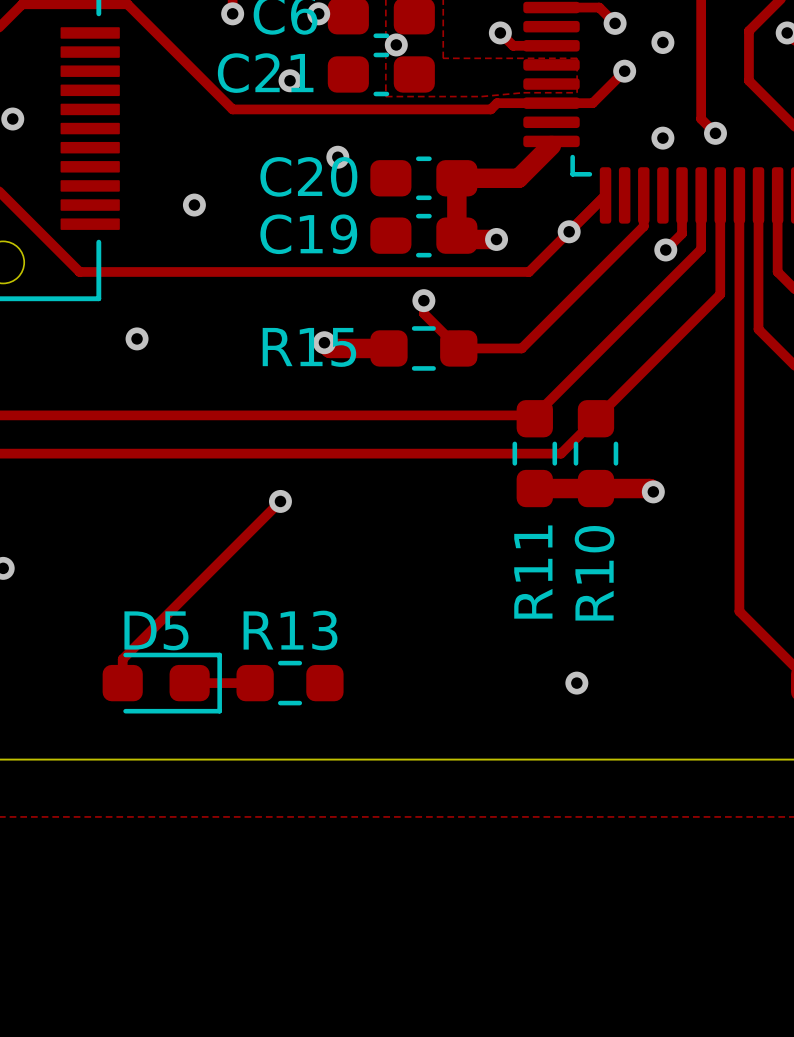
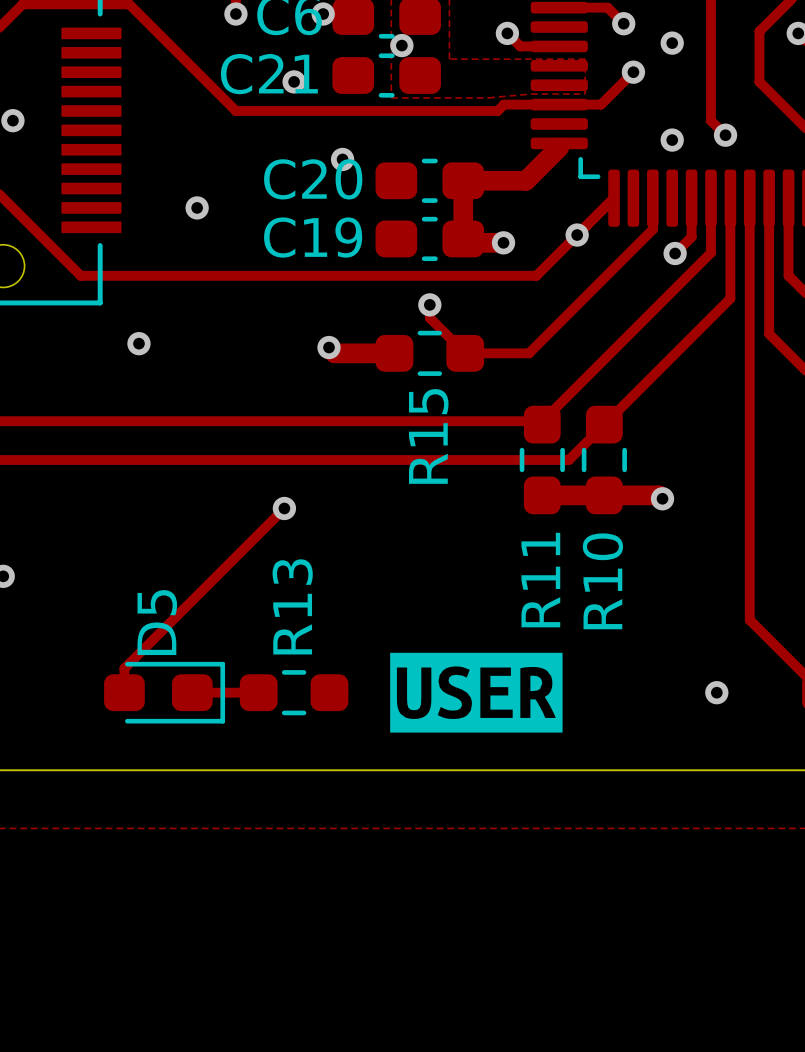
R15 name rotation: 0° (309, 347) -> 90° counterclockwise (428, 436)
R15 name position: R15 (309, 347) -> R15 (428, 436)
D5 name rotation: 0° (156, 630) -> 90° counterclockwise (157, 622)
R13 name rotation: 0° (290, 630) -> 90° counterclockwise (292, 606)
drawing: none -> [390, 652, 563, 733]
via position: (576, 683) -> (716, 692)

